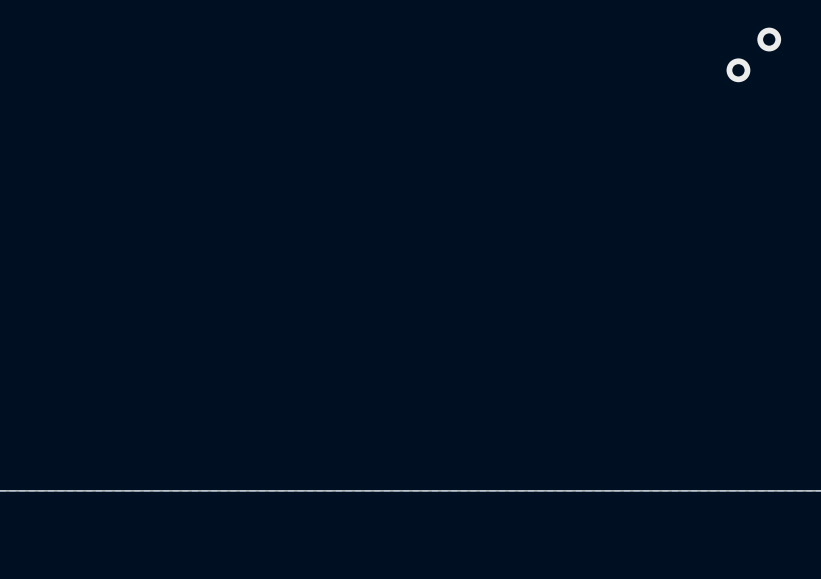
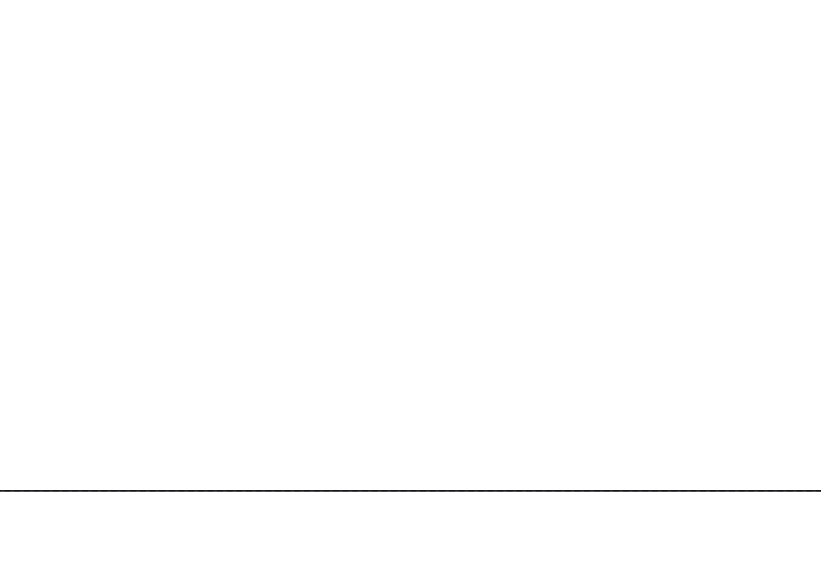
via: (769, 39) -> none
via: (738, 70) -> none

